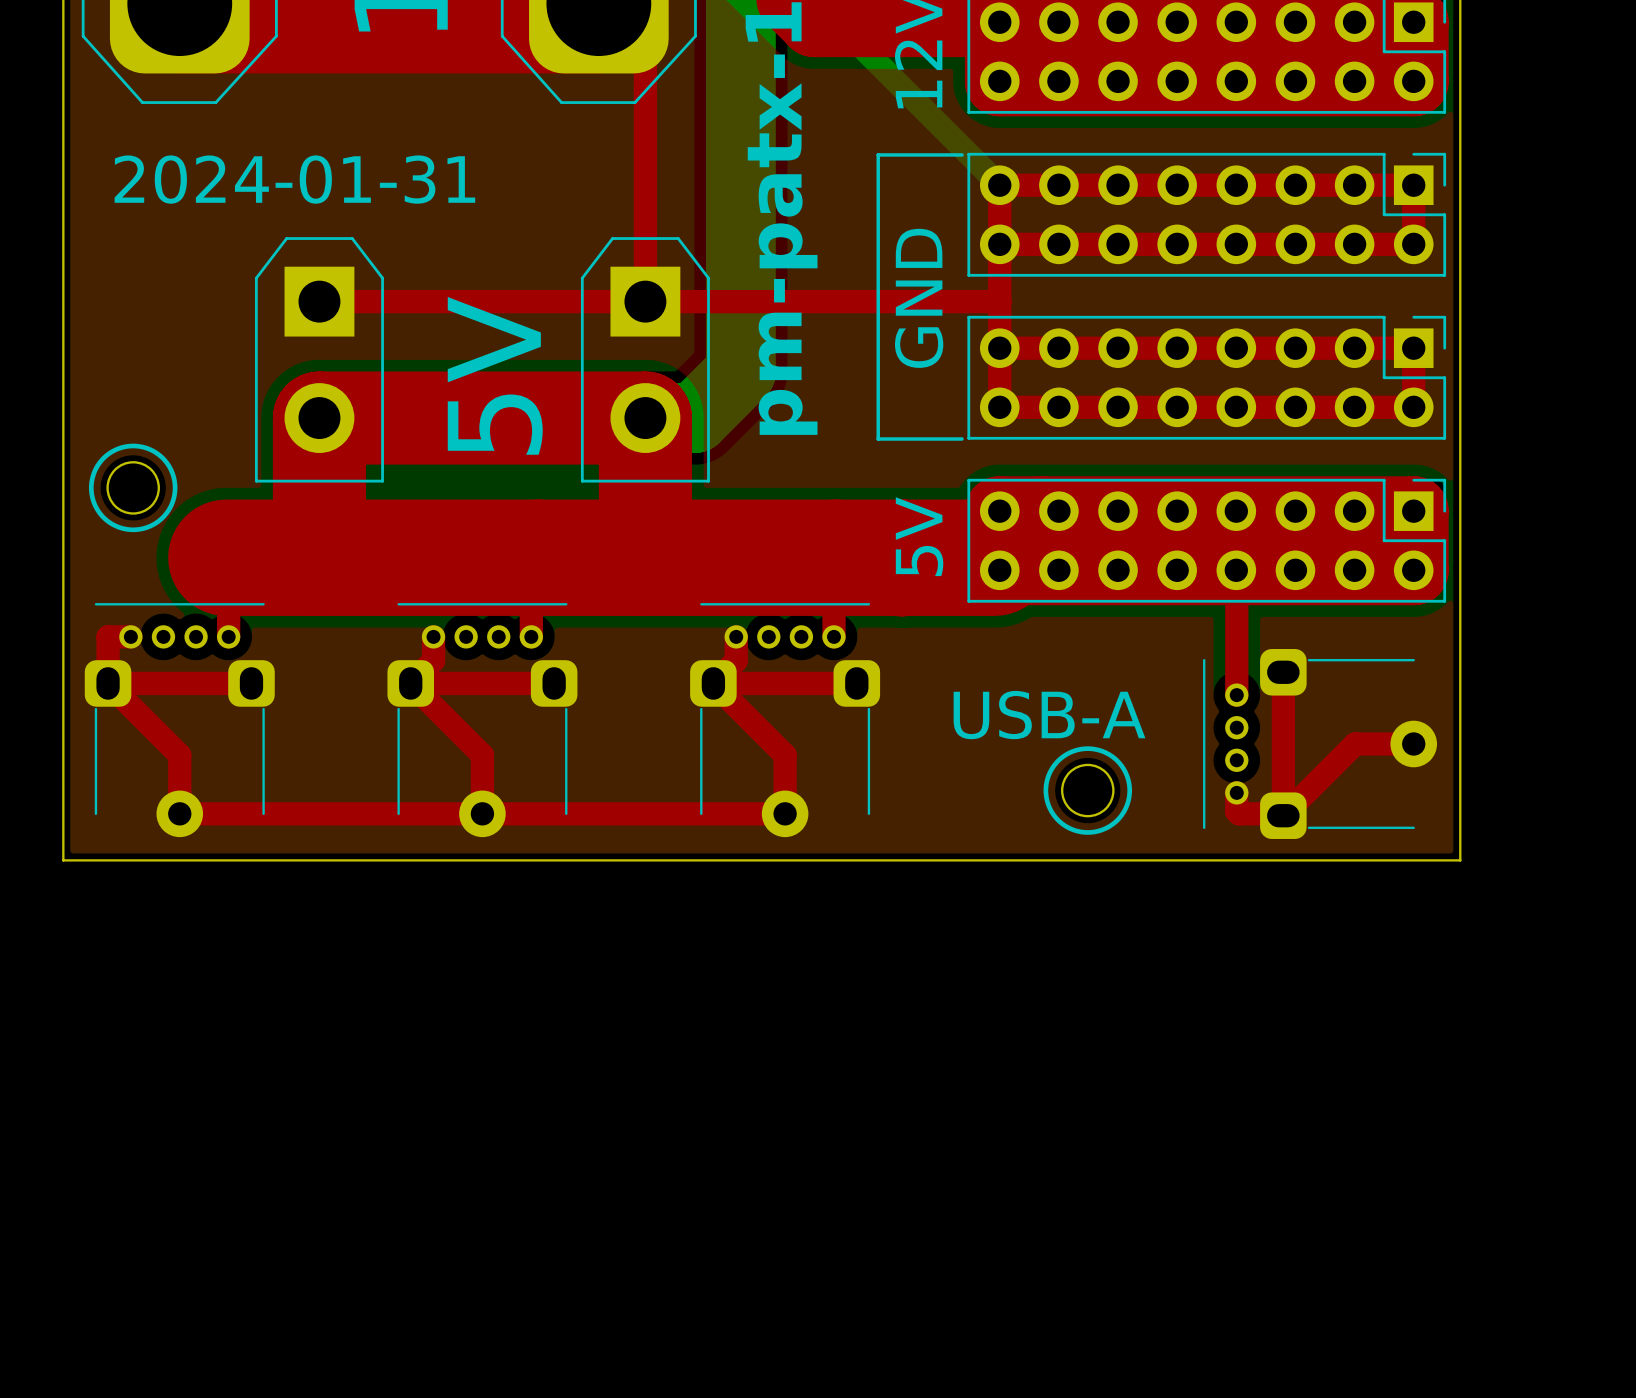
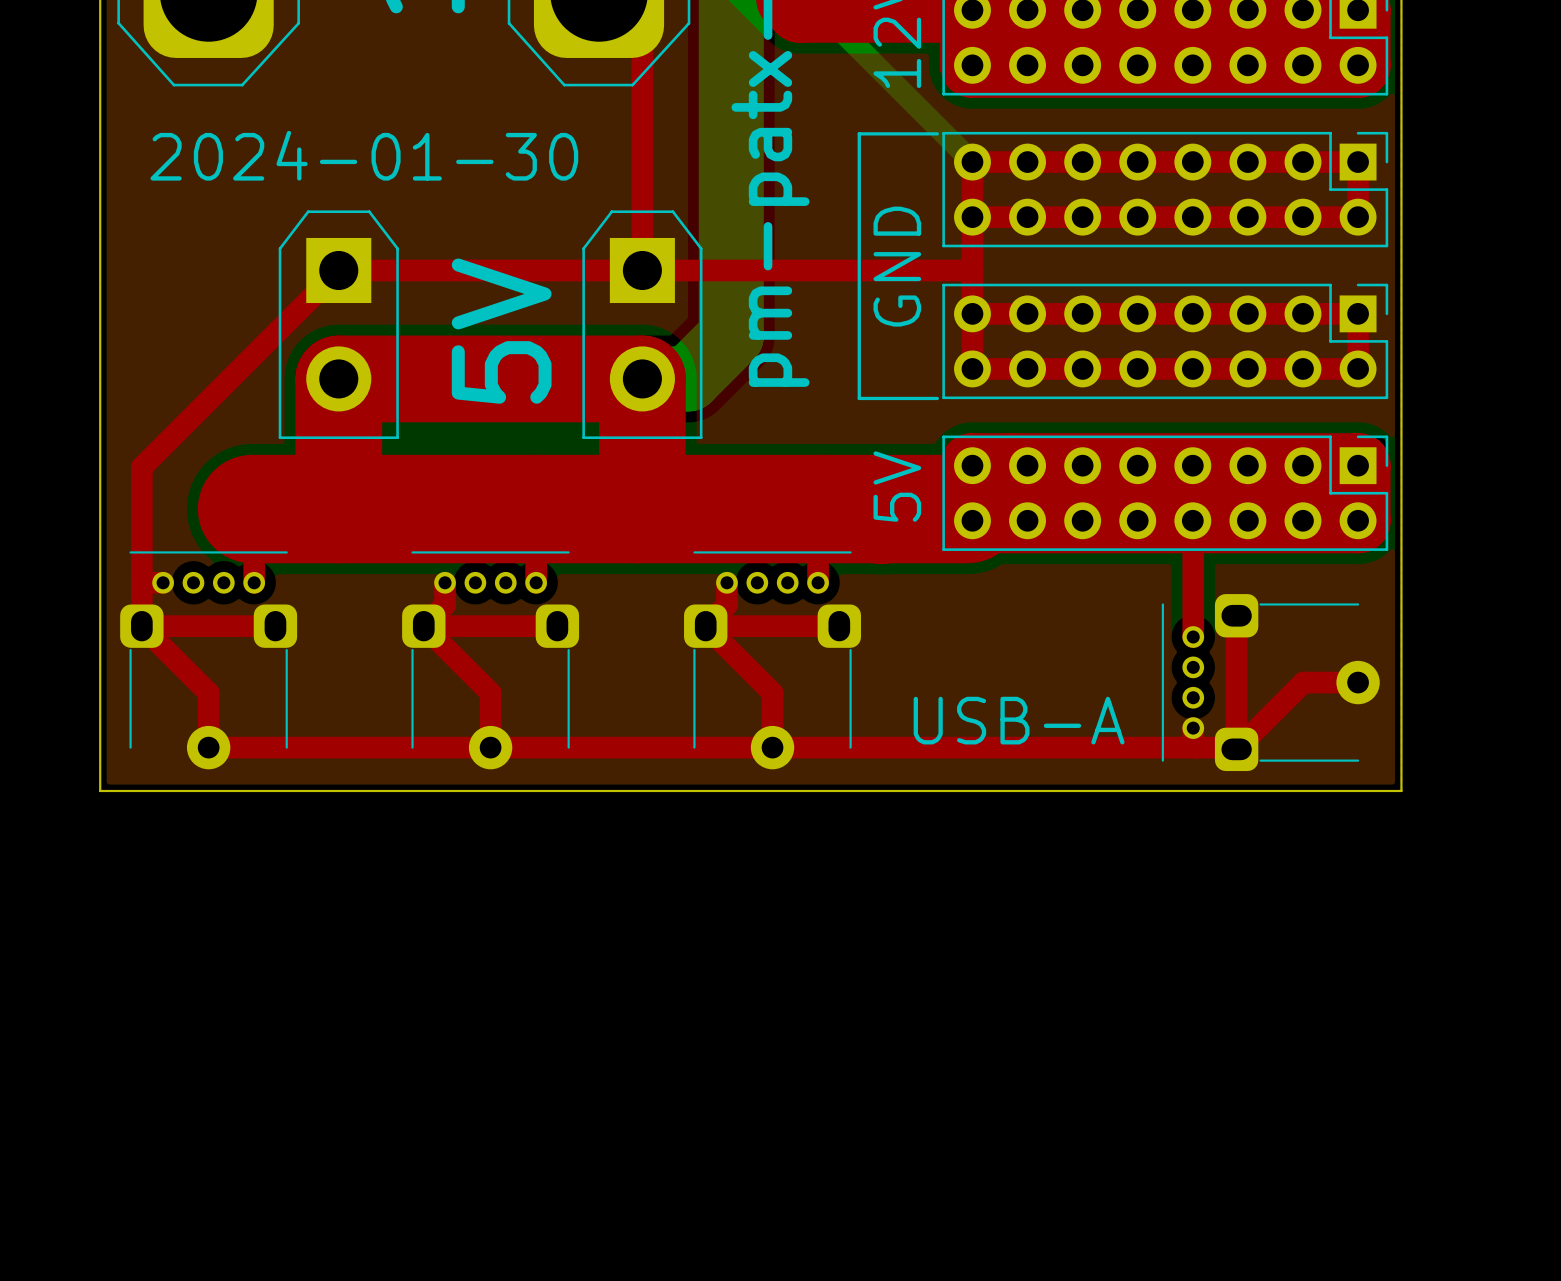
text: 2024-01-31 (294, 179) -> 2024-01-30 (364, 155)
top track: none -> (338, 270) (141, 467) (141, 582)
drawing: [88, 443, 178, 533] -> none
round board edge: [106, 461, 160, 515] -> none
text position: USB-A (1049, 715) -> USB-A (1019, 720)
drawing: [1043, 746, 1133, 835] -> none
round board edge: [1061, 763, 1115, 818] -> none
top track: none -> (772, 747) (1195, 747)

